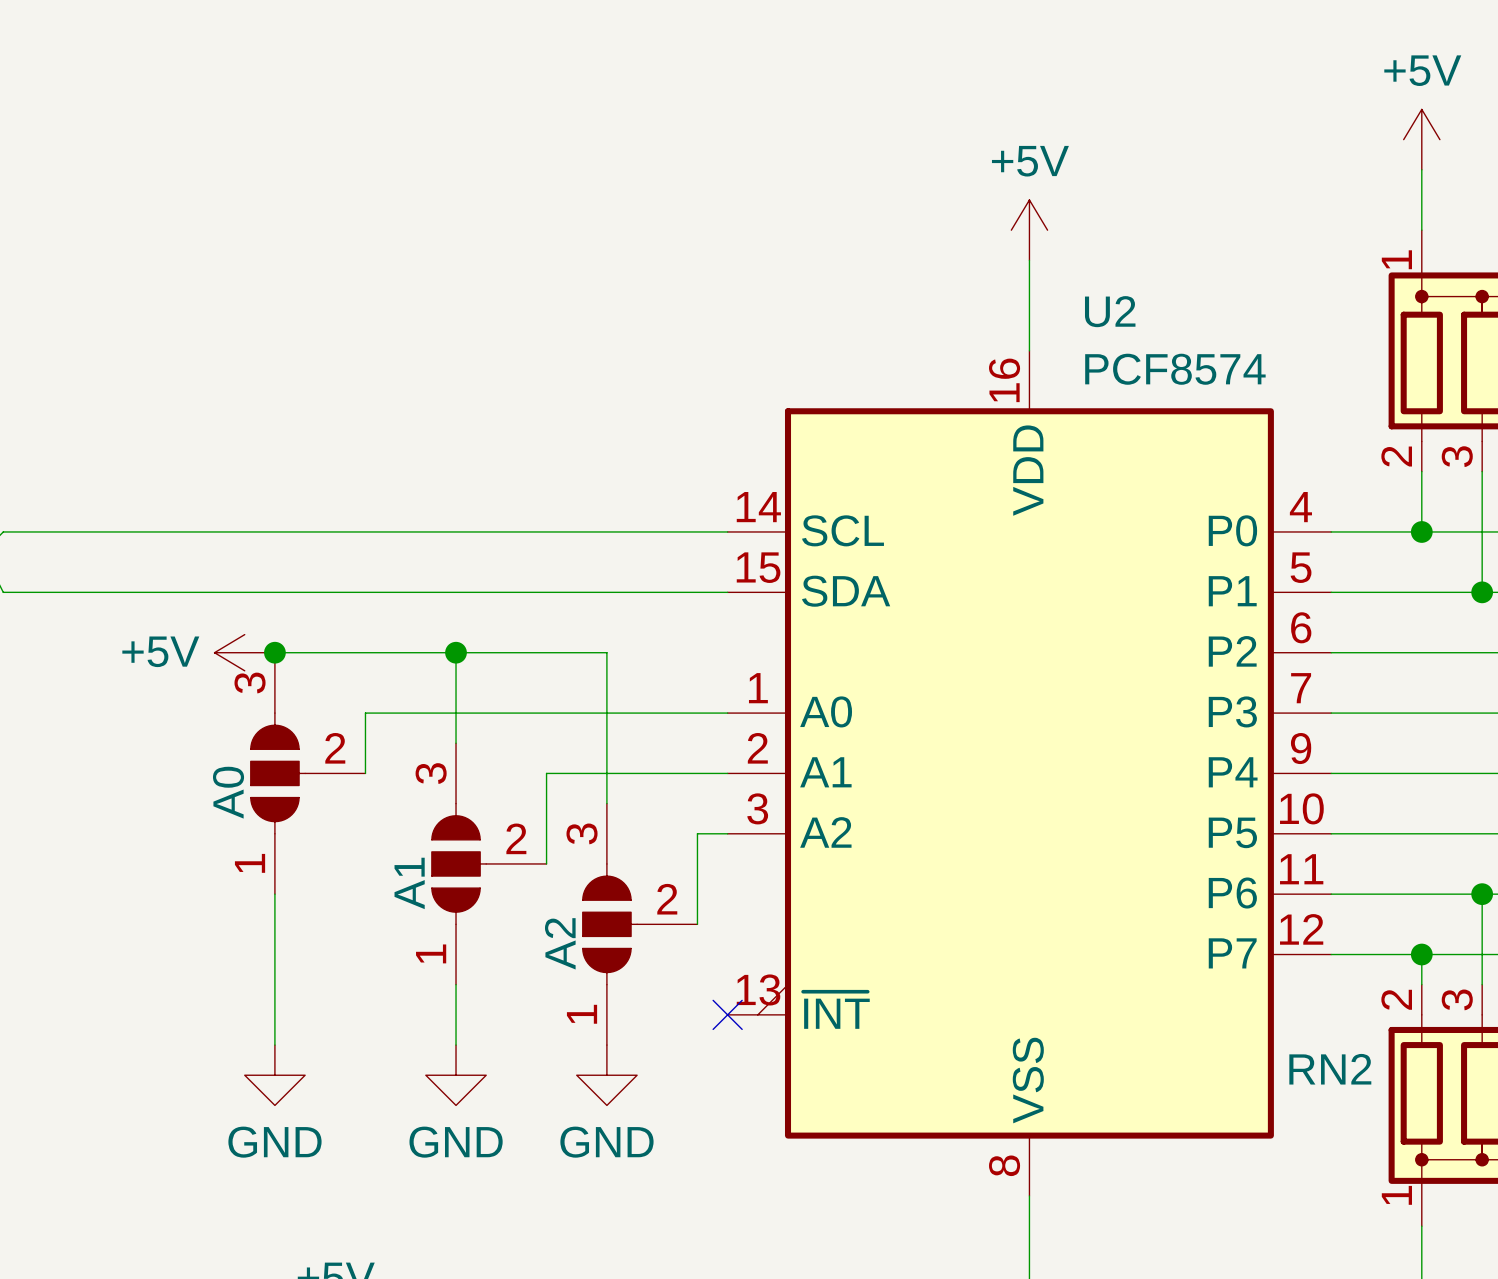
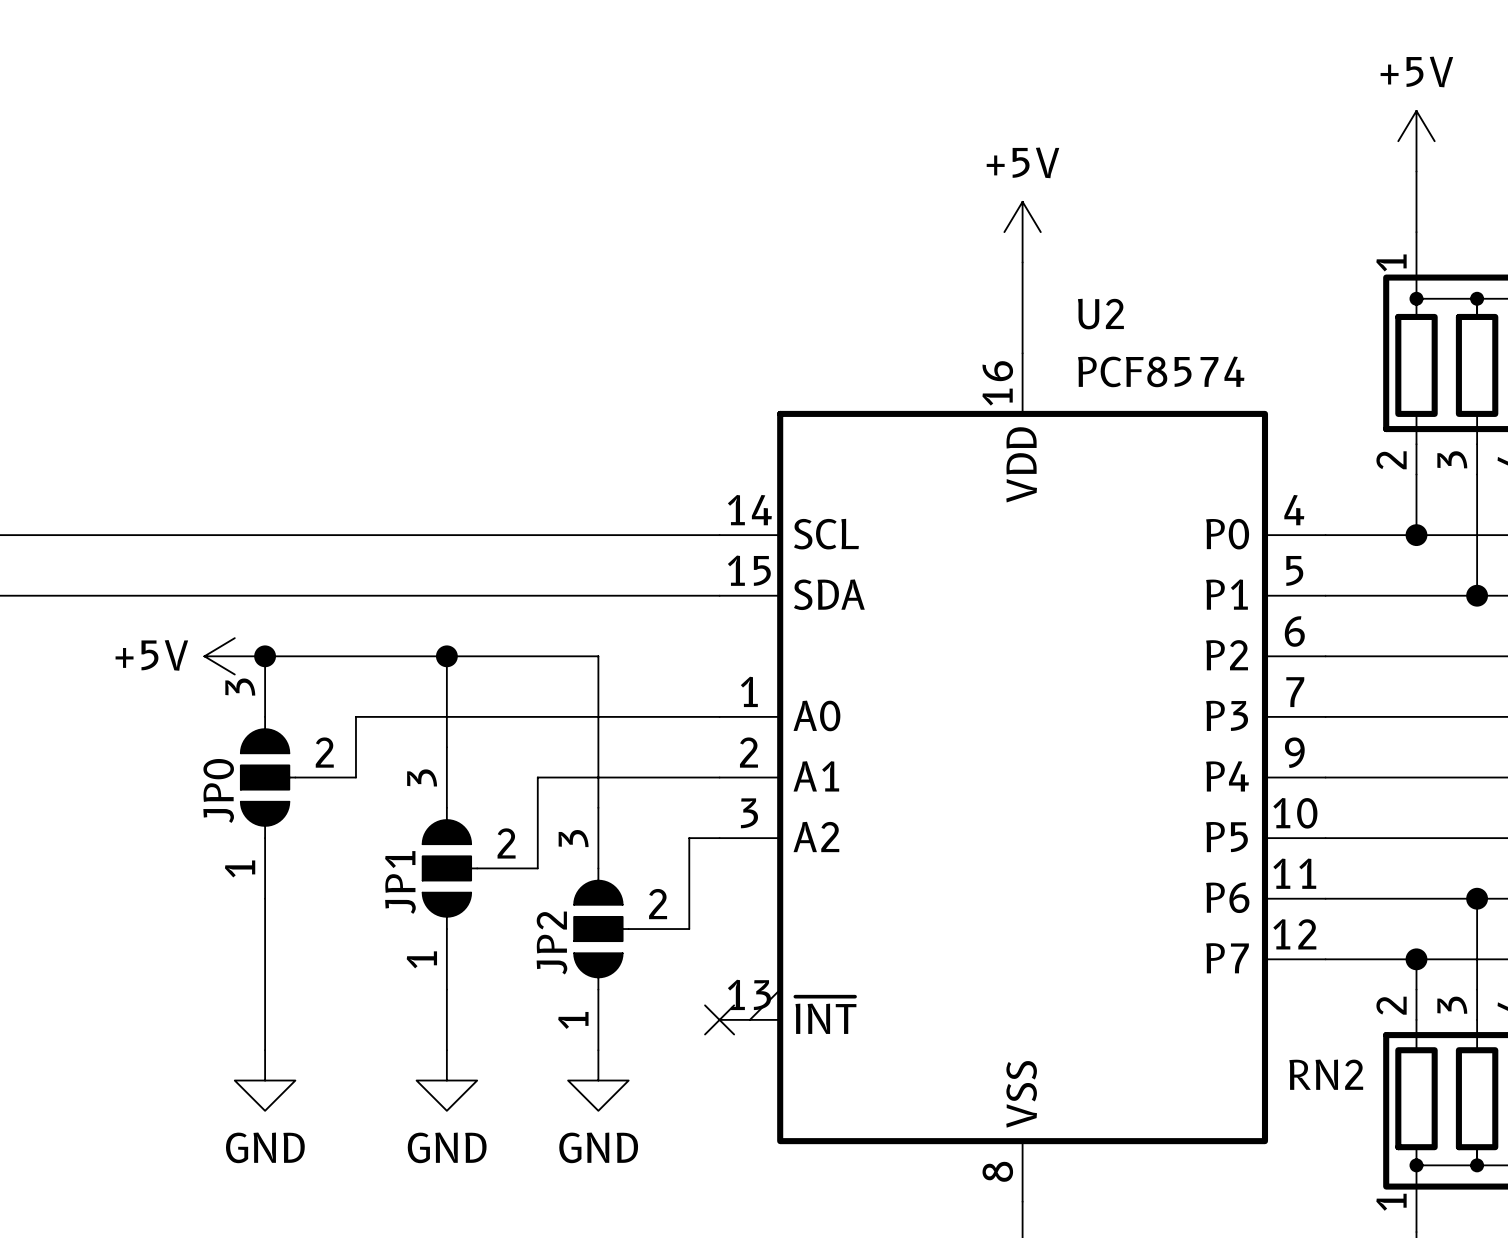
A0 name: A0 (228, 792) -> JP0 (218, 790)
A1 name: A1 (409, 883) -> JP1 (400, 882)
A2 name: A2 (560, 943) -> JP2 (551, 943)

